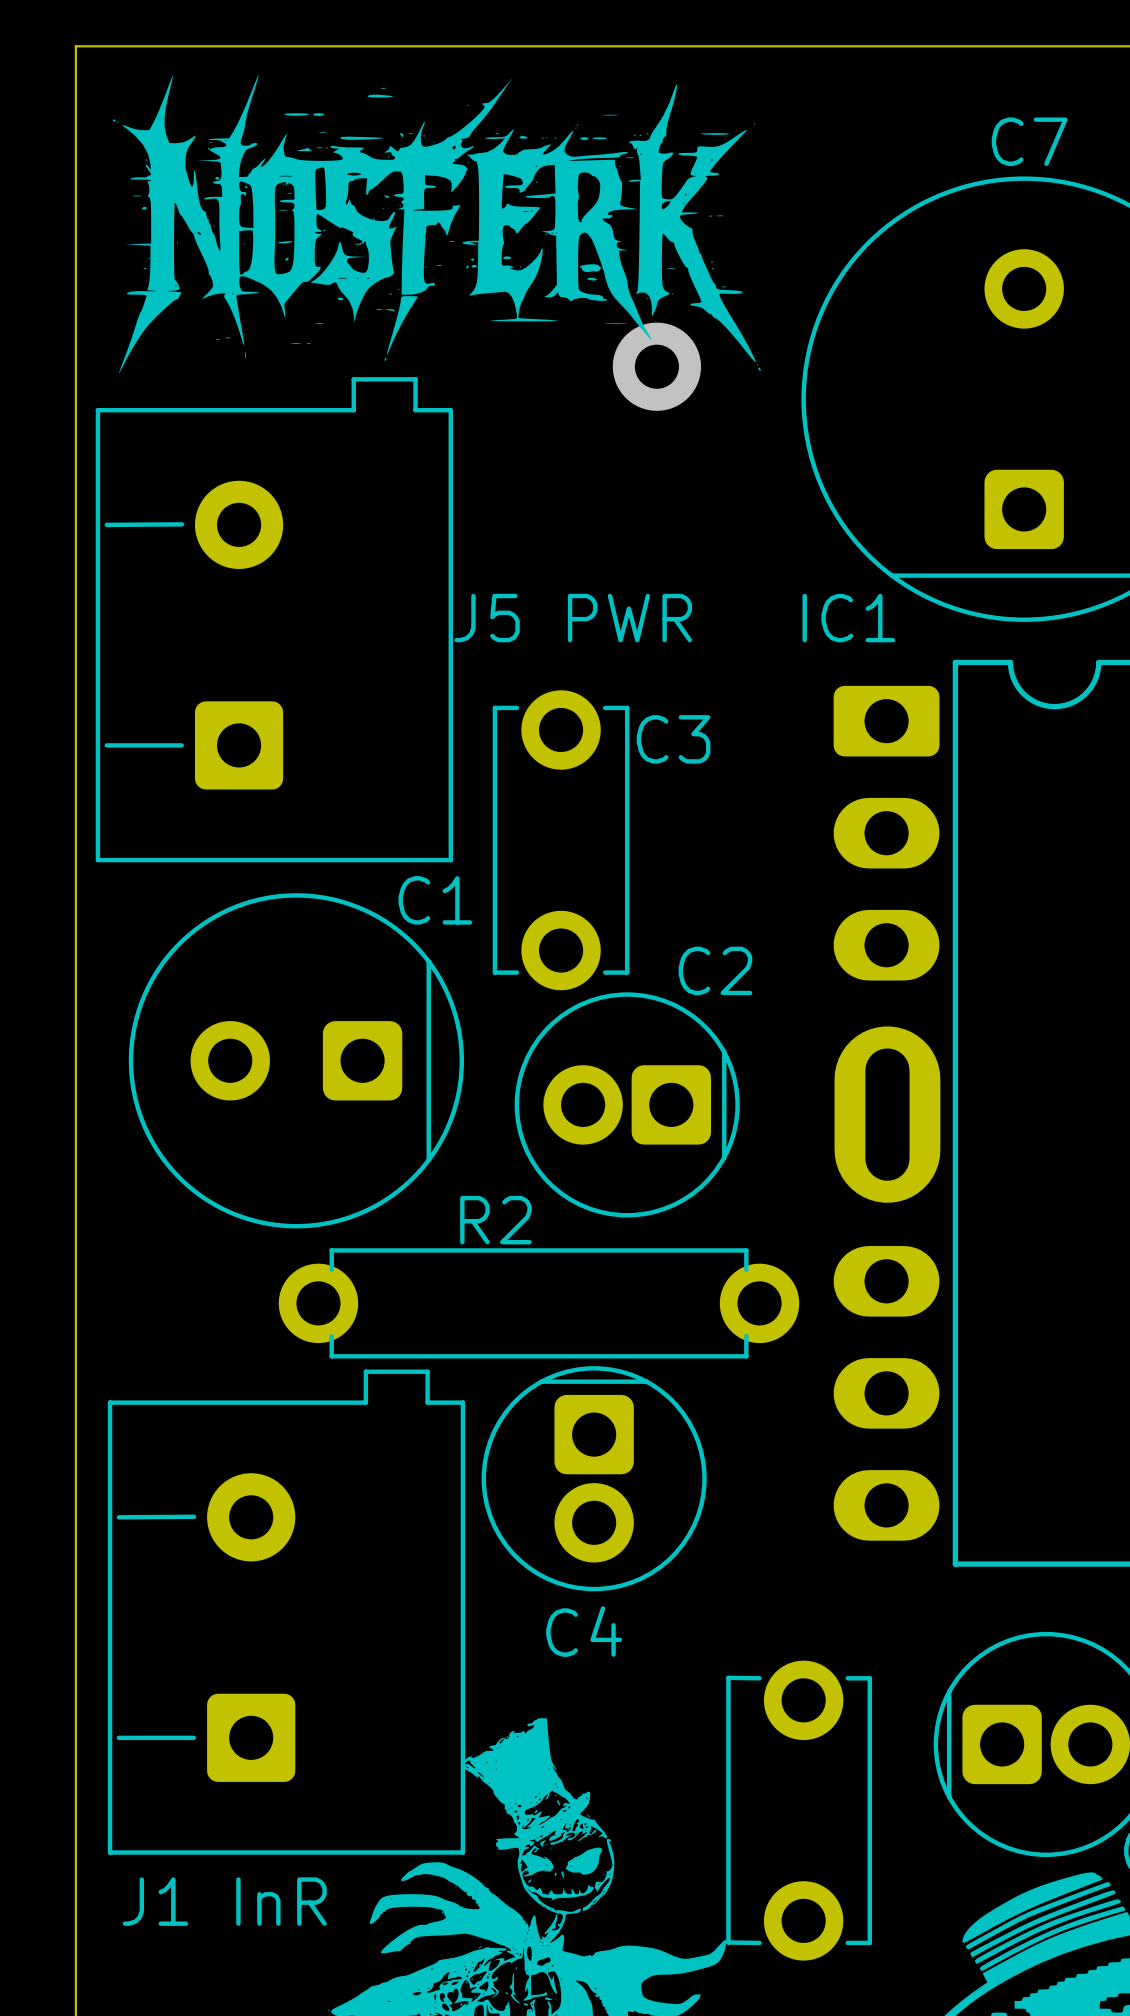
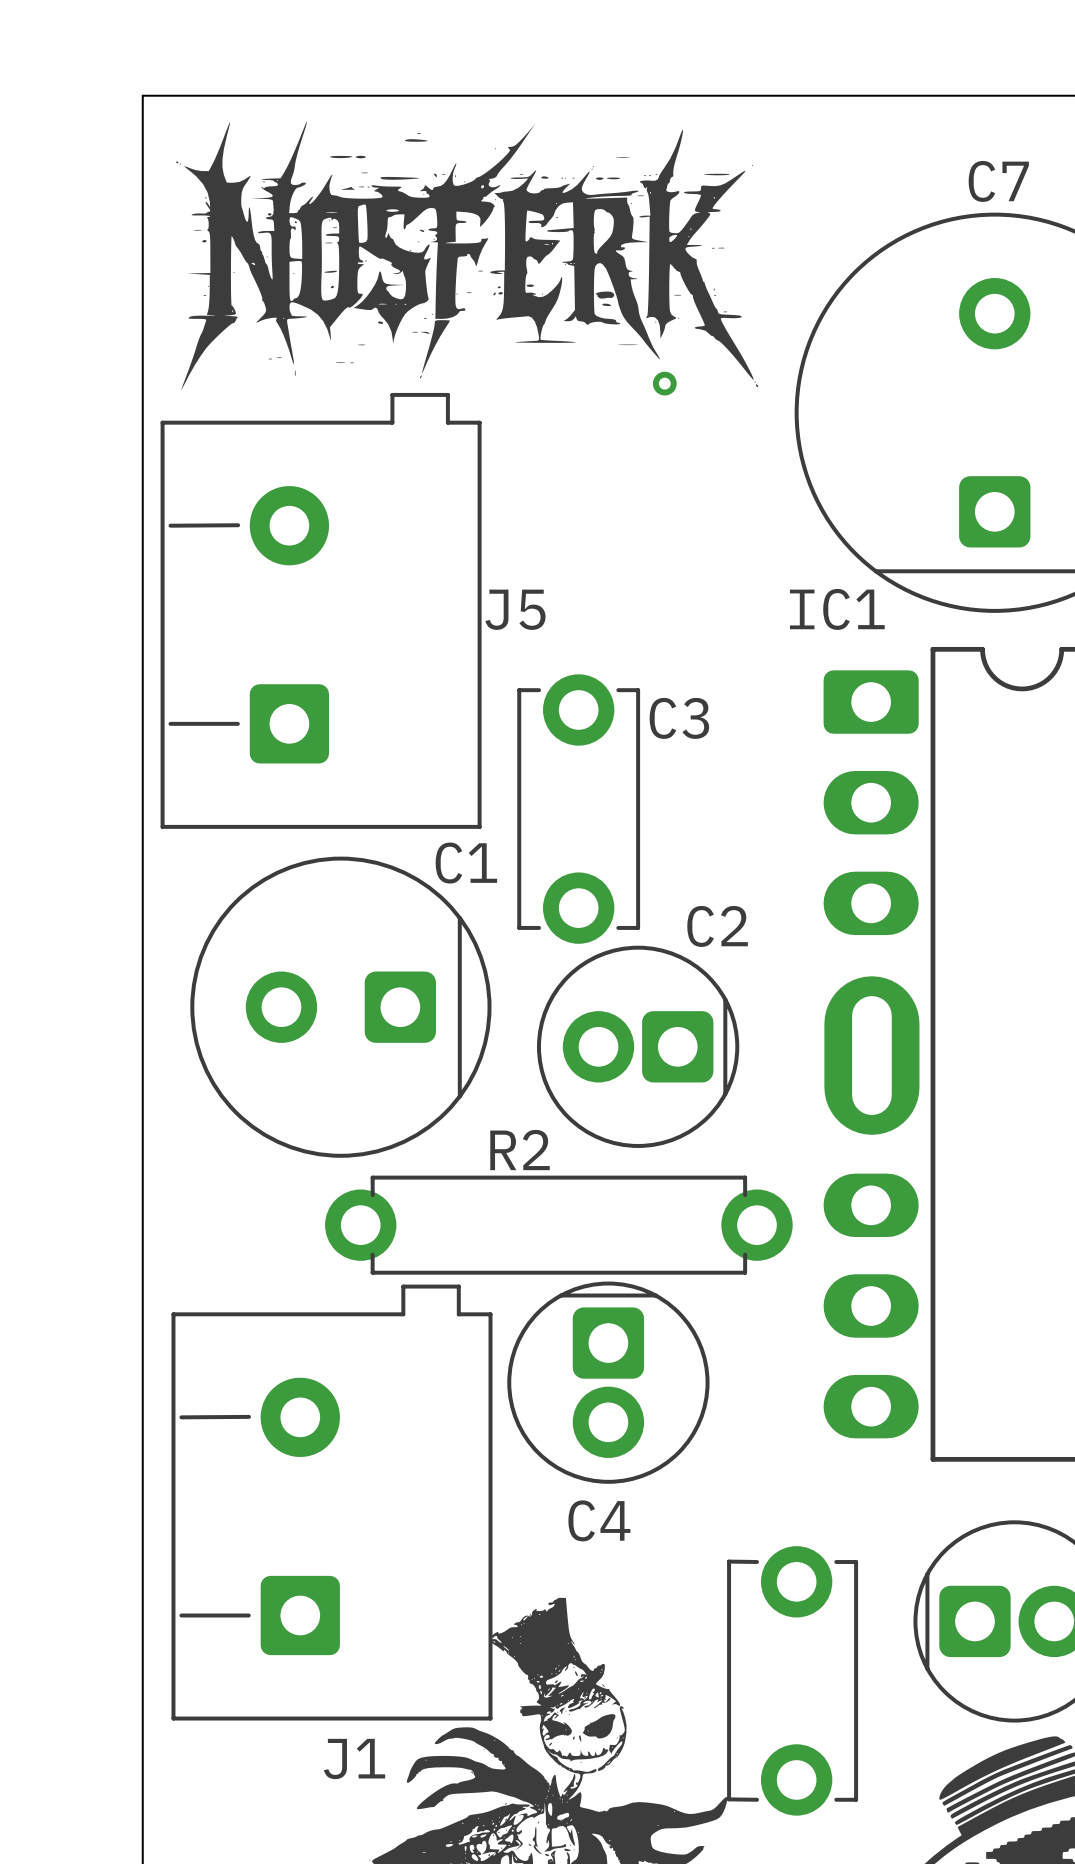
via size: [612, 322, 702, 411] -> [652, 371, 677, 396]
J5 PWR name: J5 PWR (573, 618) -> J5 (515, 609)
J1 InR name: J1 InR (224, 1901) -> J1 (354, 1759)

